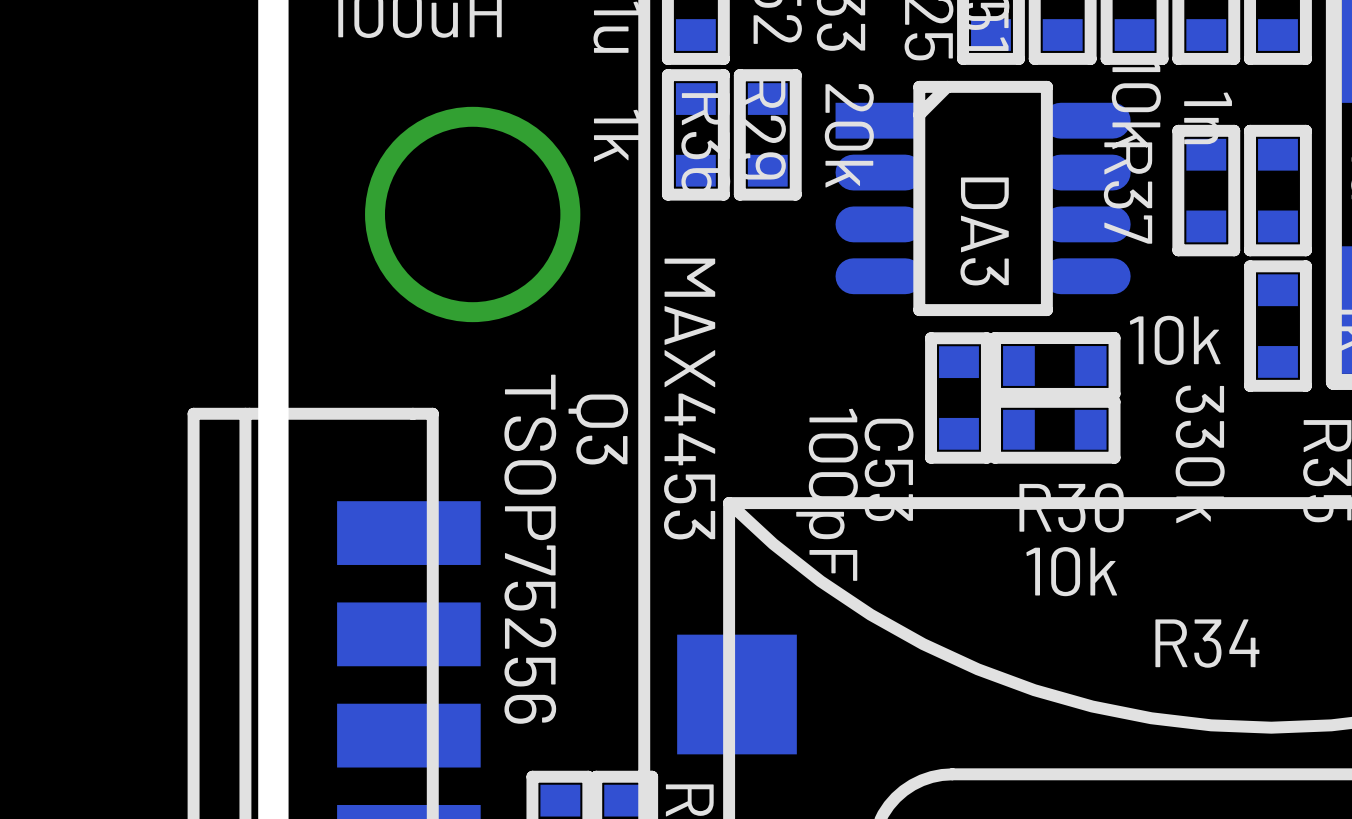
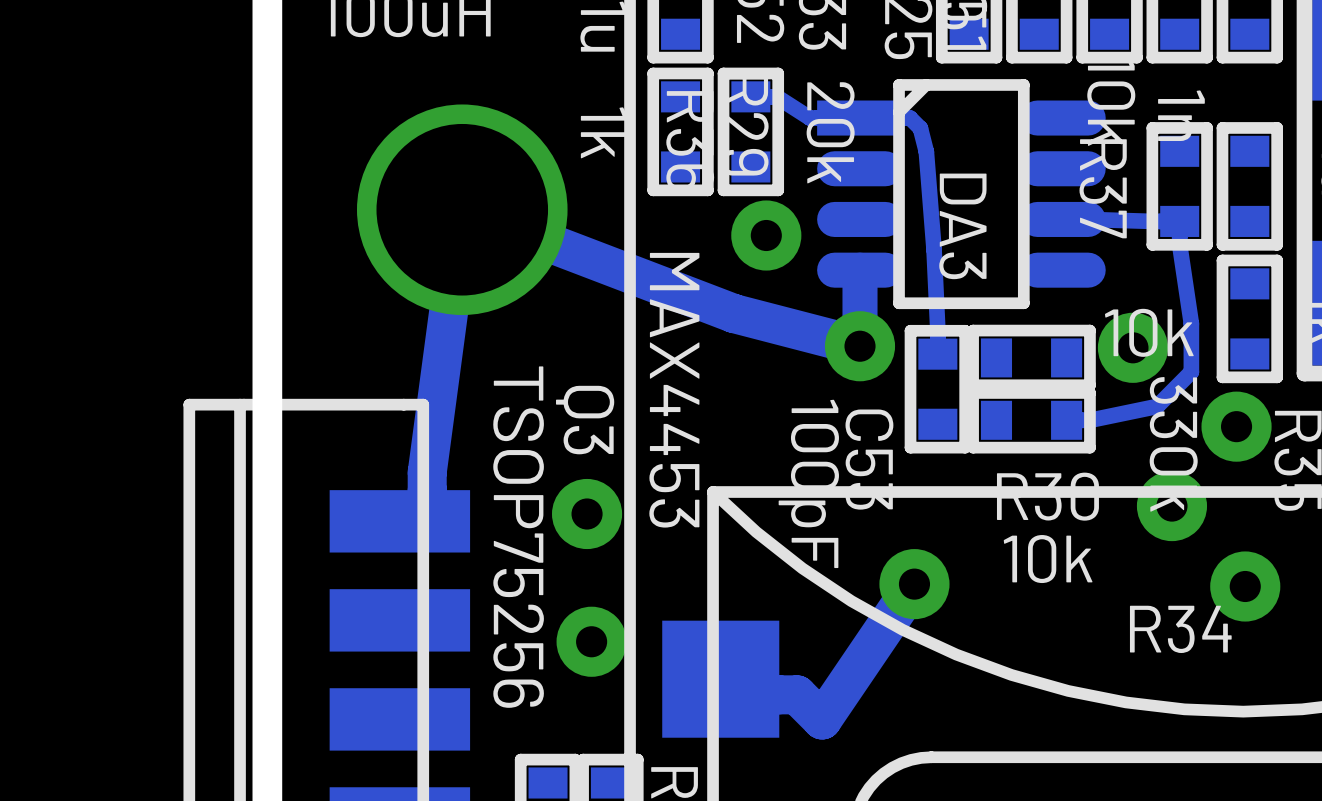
track: none -> (750, 96) (776, 96) (809, 118) (910, 118) (920, 128) (926, 151) (934, 249) (937, 354)
track: none -> (1062, 219) (1179, 221) (1179, 245) (1191, 323) (1191, 371) (1157, 406) (1090, 420) (1066, 420)
via: none -> (766, 235)
track: none -> (860, 270) (860, 346) (734, 313) (462, 209) (427, 472) (427, 509) (399, 521)
via: none -> (860, 346)
via: none -> (1132, 347)
via: none -> (1236, 426)
via: none -> (1171, 506)
via: none -> (587, 514)
track: none -> (914, 584) (822, 720) (797, 694) (759, 694) (720, 679)
via: none -> (914, 584)
via: none -> (1245, 586)
via: none -> (591, 641)

